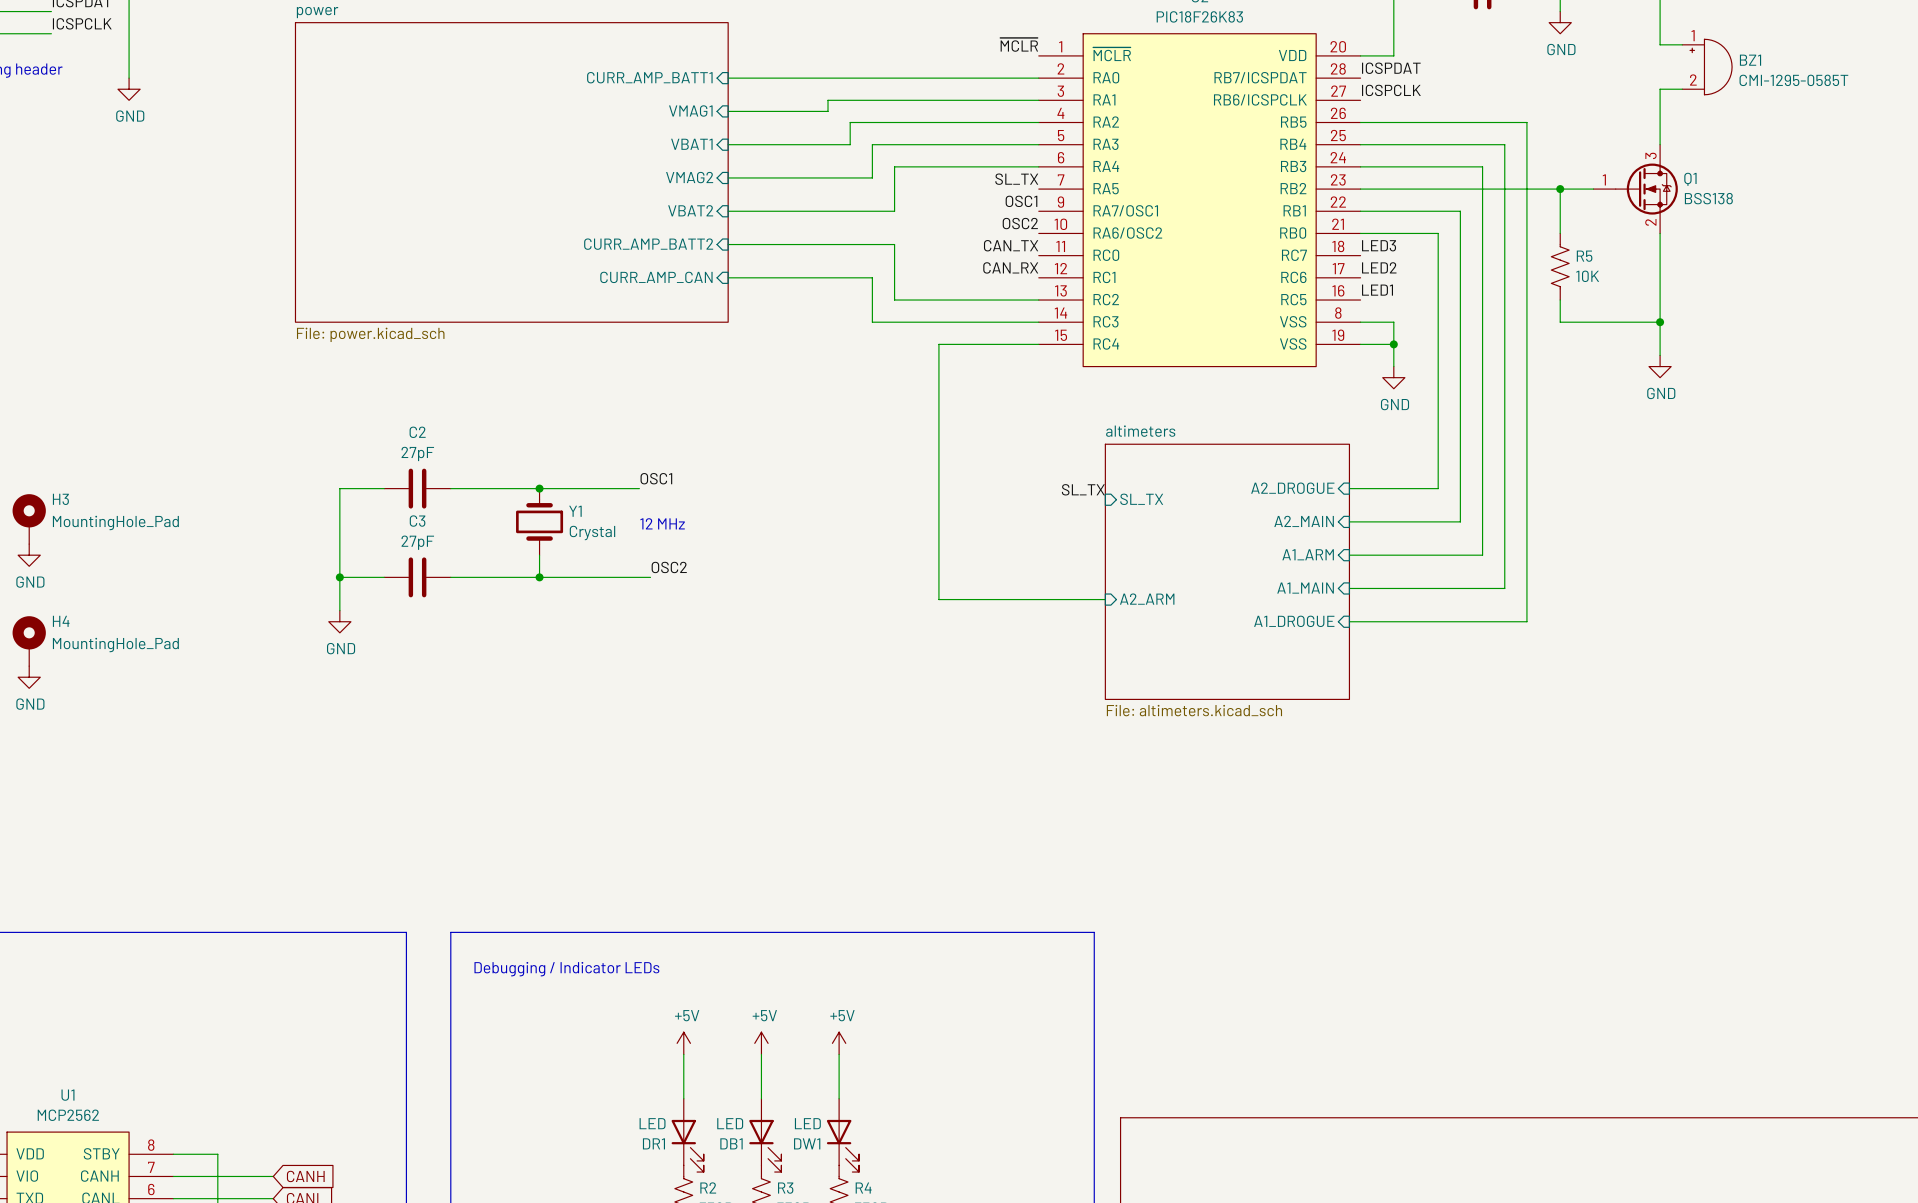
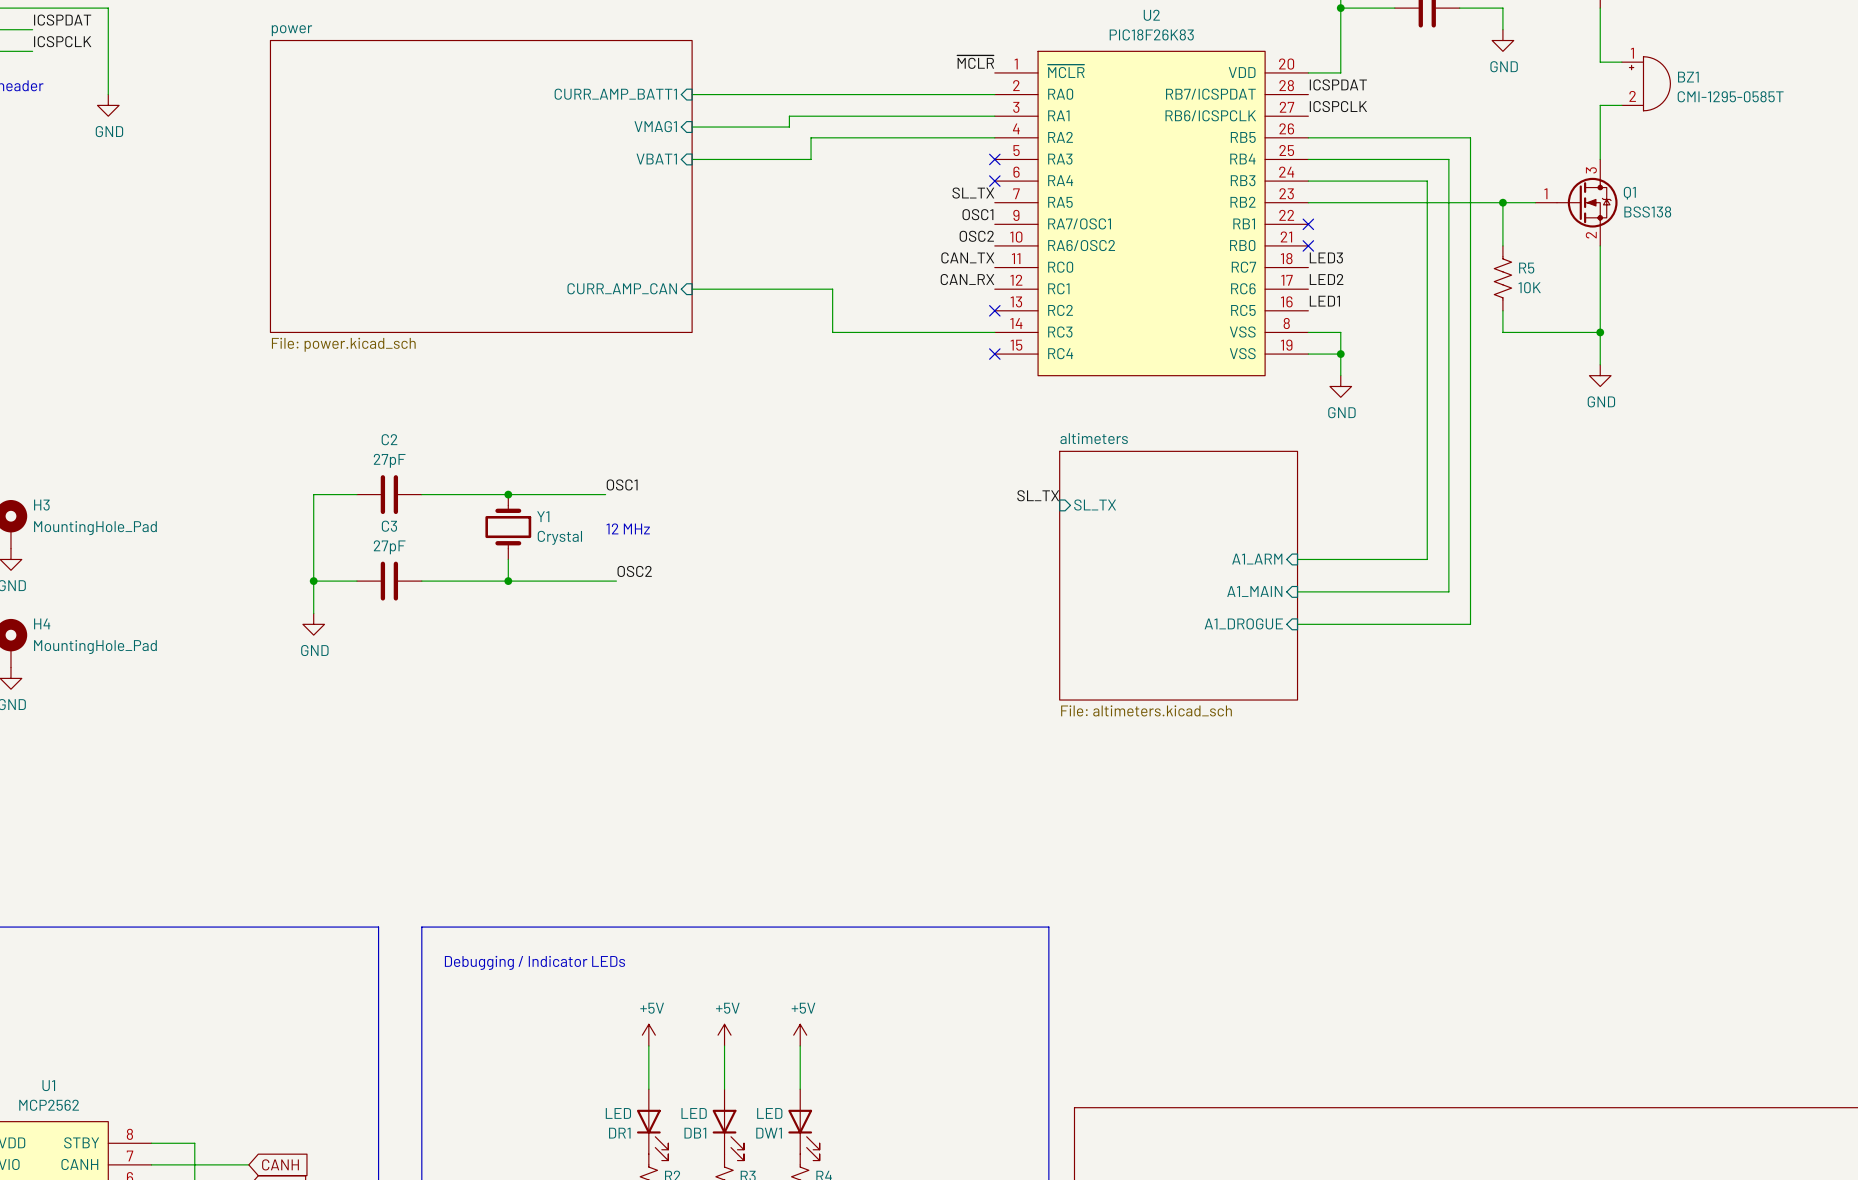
wire: (1038, 144) (872, 144) (872, 177) (728, 177) -> none
no-connect mark: none -> (994, 159)
wire: (1038, 166) (894, 166) (894, 211) (728, 211) -> none
no-connect mark: none -> (994, 181)
sheet pin: VMAG2 (689, 177) -> none
sheet pin: VBAT2 (690, 210) -> none
wire: (1360, 211) (1460, 211) (1460, 521) (1349, 521) -> none
no-connect mark: none -> (1308, 224)
wire: (1360, 233) (1438, 233) (1438, 488) (1349, 488) -> none
no-connect mark: none -> (1308, 245)
sheet pin: CURR_AMP_BATT2 (648, 244) -> none
wire: (728, 244) (894, 244) (894, 300) (1038, 300) -> none
no-connect mark: none -> (994, 310)
wire: (1038, 344) (938, 344) (938, 599) (1105, 599) -> none
no-connect mark: none -> (994, 354)
sheet pin: A2_DROGUE (1292, 488) -> none
sheet pin: A2_MAIN (1304, 521) -> none
sheet pin: A2_ARM (1147, 599) -> none

